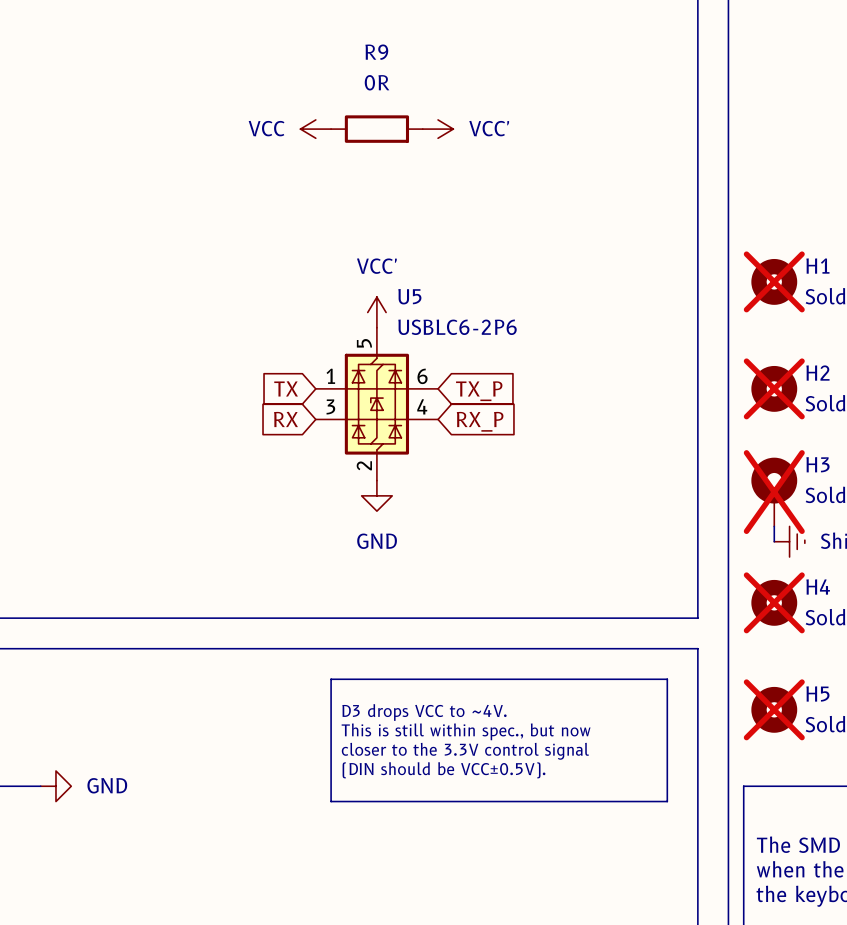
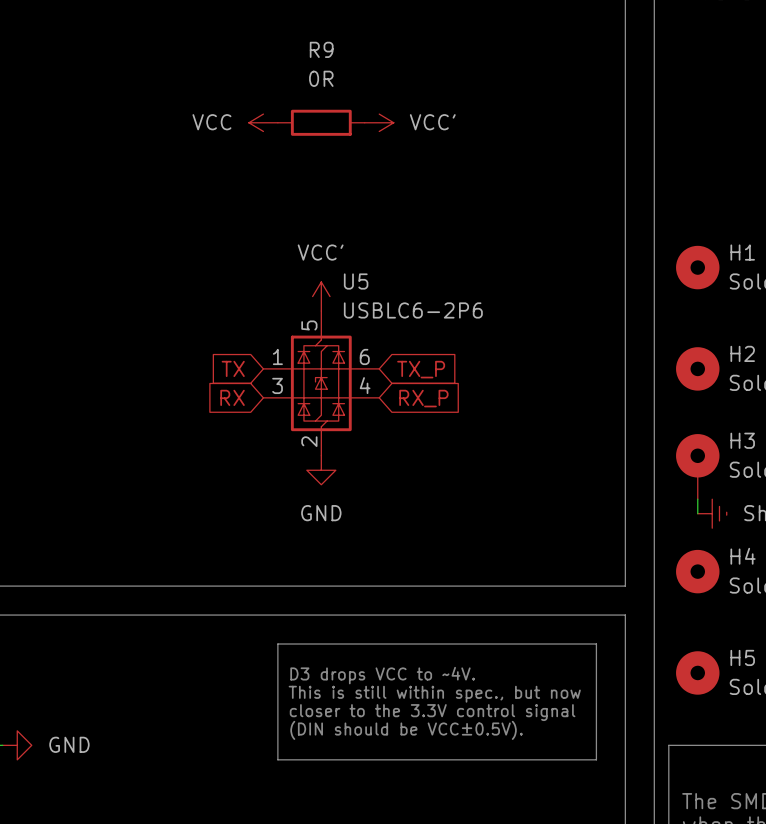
H1 do-not-place cross: (774, 281) -> none
H2 do-not-place cross: (774, 388) -> none
H3 do-not-place cross: (774, 492) -> none
H4 do-not-place cross: (774, 602) -> none
H5 do-not-place cross: (774, 709) -> none

